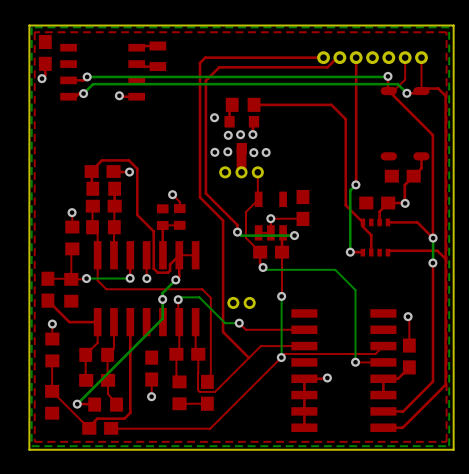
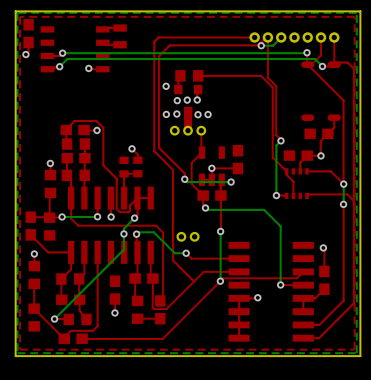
top track: none -> (267, 37) (267, 77) (276, 86) (276, 135) (280, 139)
top track: (356, 57) (355, 184) -> none
bottom track: none -> (281, 37) (272, 45) (261, 45)
via: none -> (261, 45)

